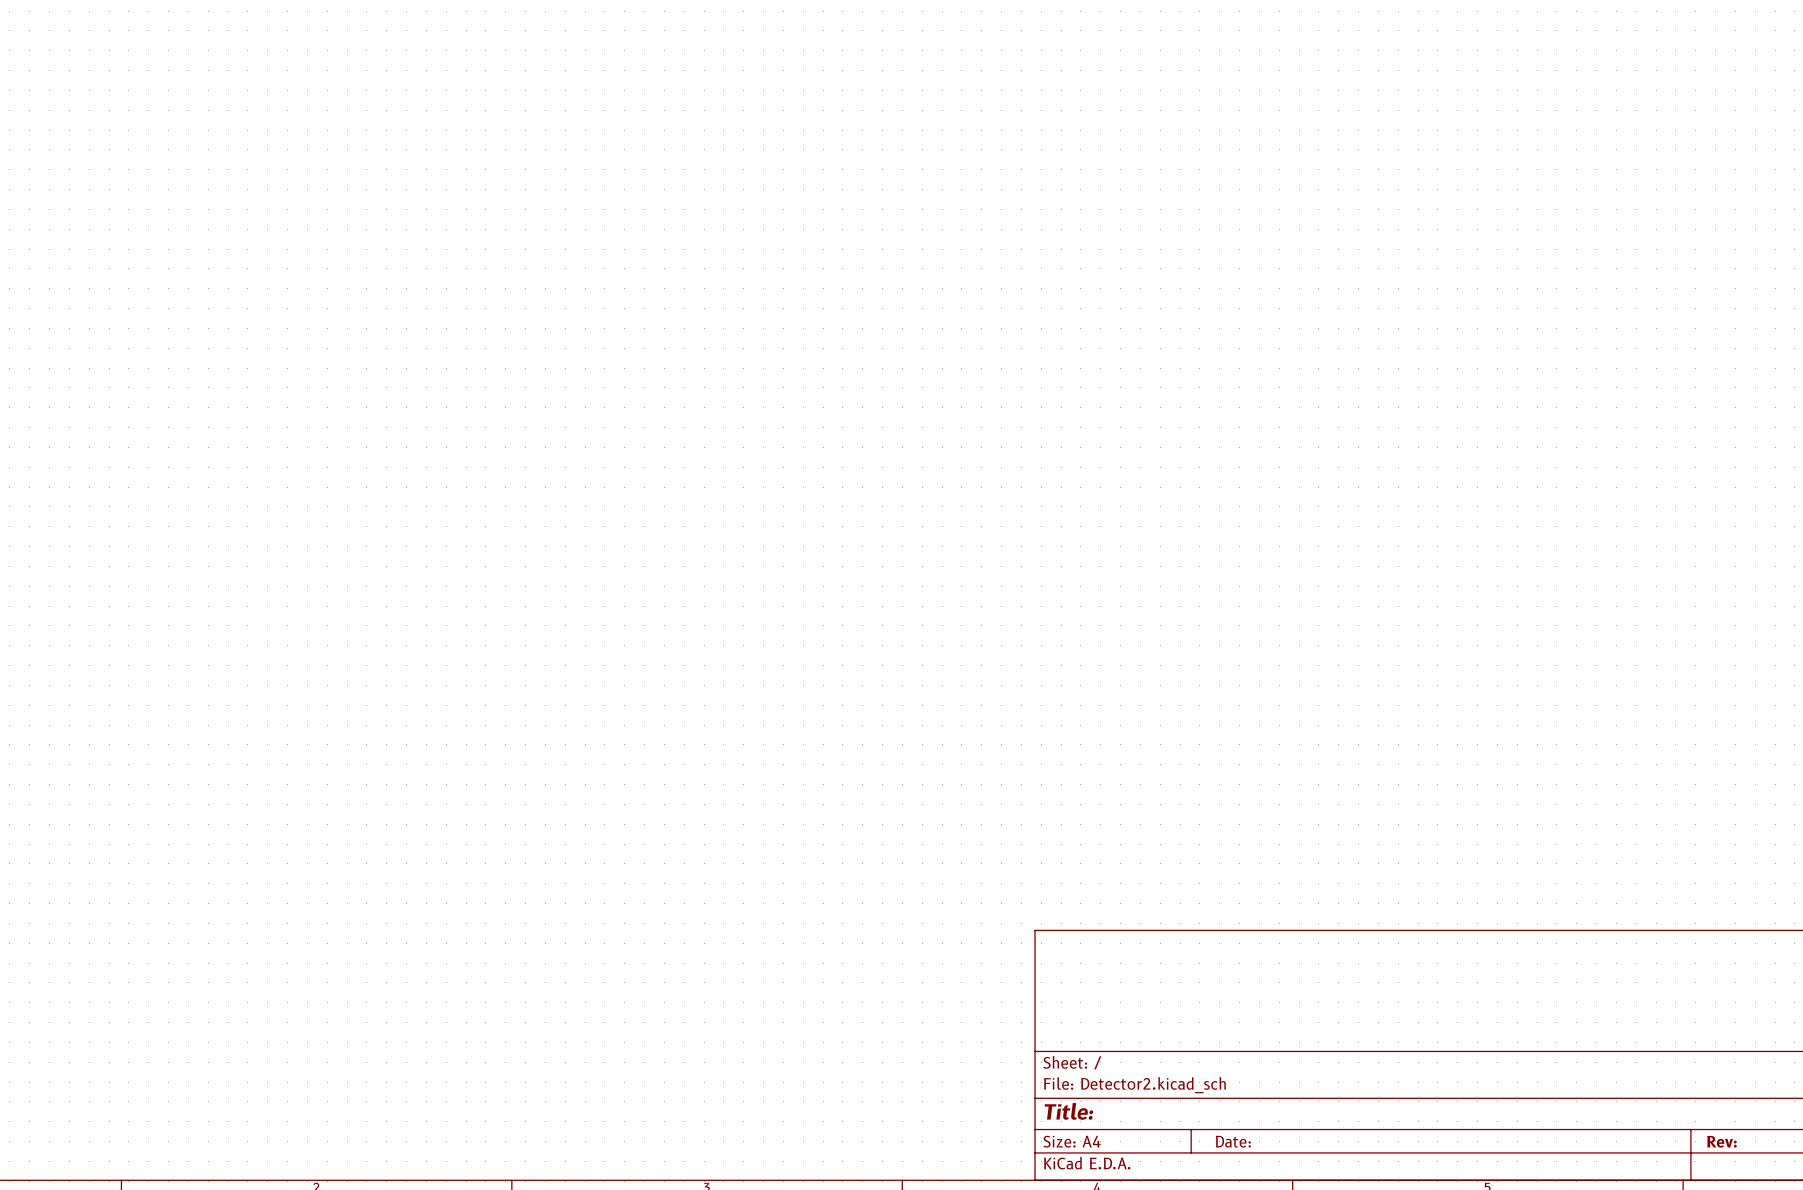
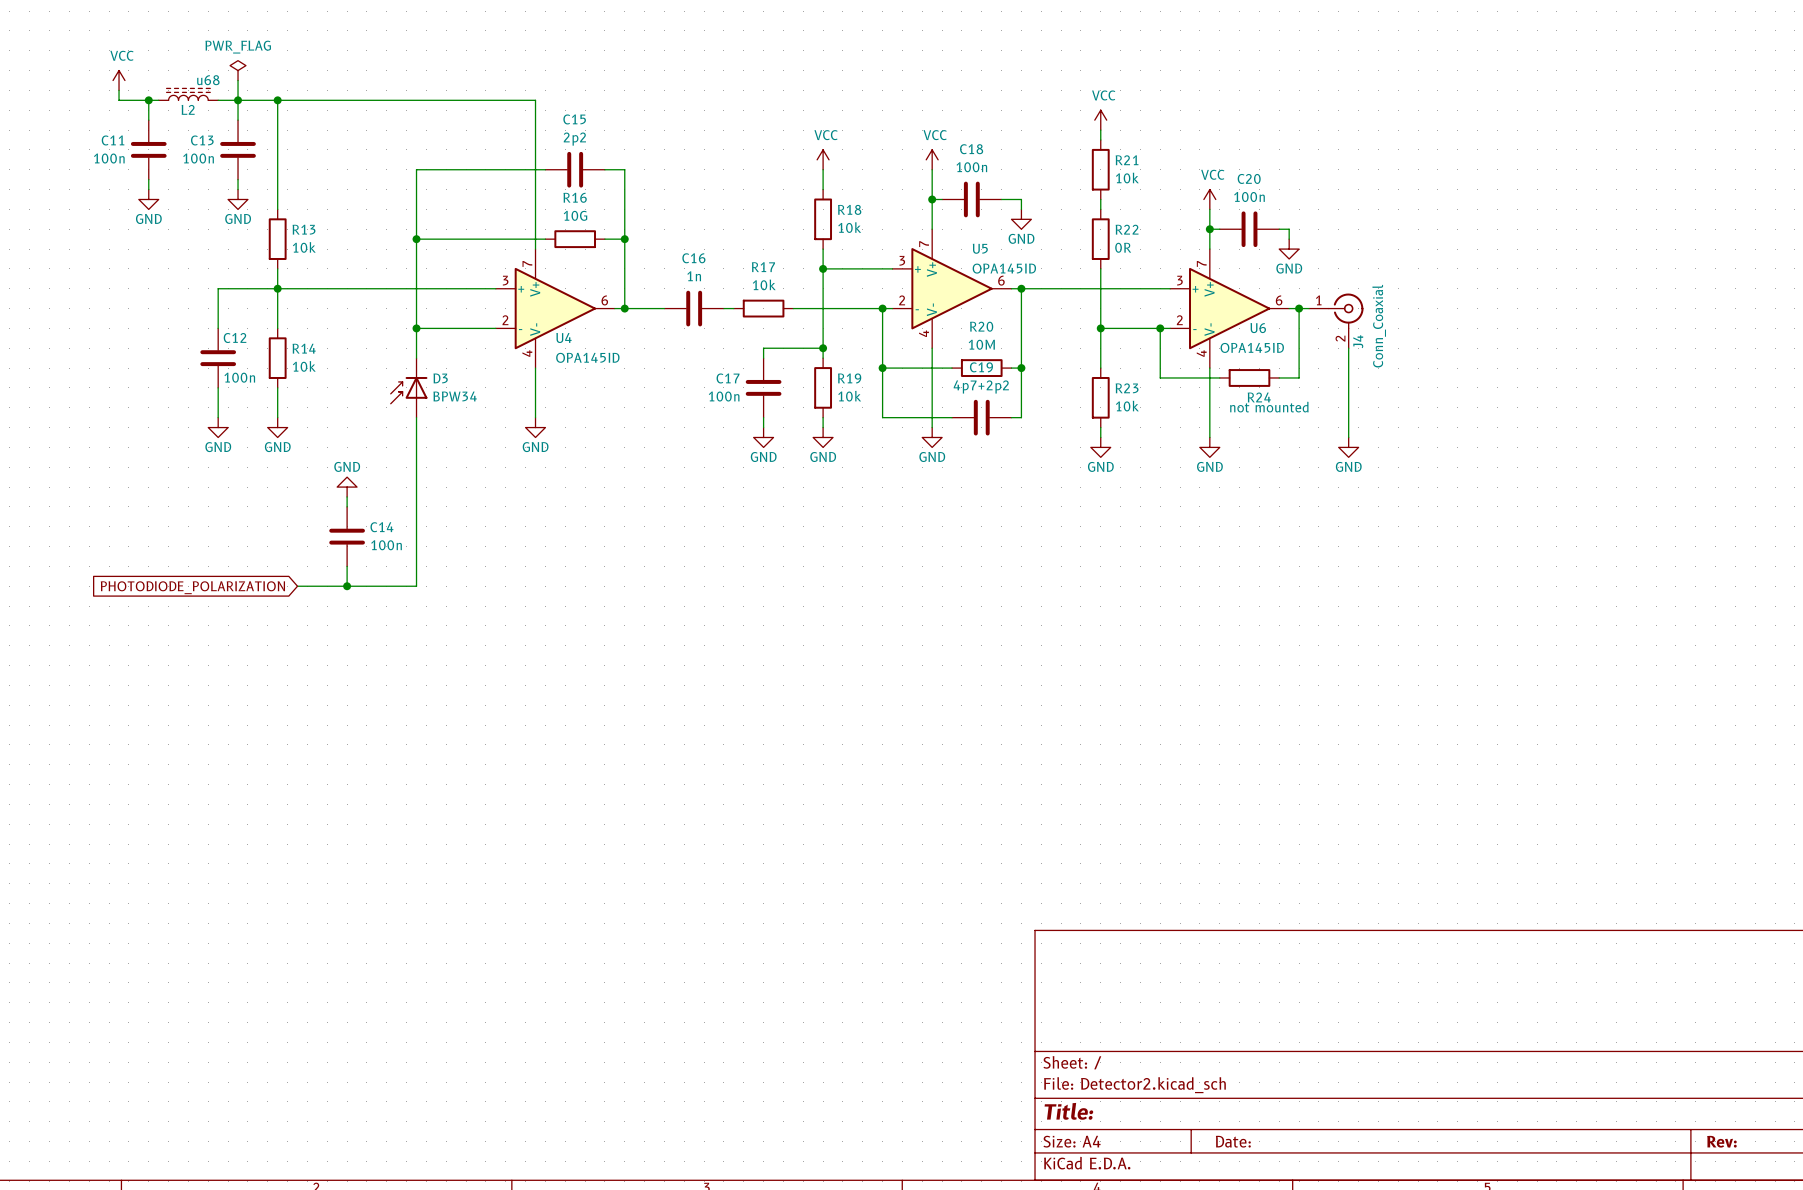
power symbol: none -> PWR_FLAG (238, 70)
power symbol: none -> VCC (119, 80)
wire: none -> (238, 80) (238, 120)
wire: none -> (119, 90) (119, 100) (158, 100)
L2: none -> u68 (188, 94)
wire: none -> (148, 100) (148, 120)
junction: none -> (148, 100)
wire: none -> (218, 100) (535, 100) (535, 249)
junction: none -> (238, 100)
wire: none -> (277, 100) (277, 209)
junction: none -> (277, 100)
power symbol: none -> VCC (1100, 120)
wire: none -> (1100, 130) (1100, 139)
C11: none -> 100n (148, 149)
C13: none -> 100n (238, 149)
power symbol: none -> VCC (823, 159)
power symbol: none -> VCC (932, 159)
wire: none -> (545, 169) (416, 169) (416, 358)
C15: none -> 2p2 (575, 169)
wire: none -> (604, 169) (624, 169) (624, 308)
wire: none -> (823, 169) (823, 189)
wire: none -> (932, 169) (932, 229)
R21: none -> 10k (1100, 169)
wire: none -> (148, 179) (148, 189)
wire: none -> (238, 179) (238, 189)
power symbol: none -> GND (148, 199)
power symbol: none -> GND (238, 199)
wire: none -> (932, 199) (942, 199)
junction: none -> (932, 199)
C18: none -> 100n (971, 199)
wire: none -> (1001, 199) (1021, 199) (1021, 209)
wire: none -> (1100, 199) (1100, 209)
power symbol: none -> VCC (1209, 199)
wire: none -> (1209, 209) (1209, 249)
R18: none -> 10k (823, 219)
power symbol: none -> GND (1021, 219)
wire: none -> (1209, 229) (1219, 229)
junction: none -> (1209, 229)
C20: none -> 100n (1249, 229)
wire: none -> (1279, 229) (1289, 229) (1289, 239)
R13: none -> 10k (277, 239)
wire: none -> (416, 239) (545, 239)
junction: none -> (416, 239)
R16: none -> 10G (575, 239)
wire: none -> (604, 239) (624, 239)
junction: none -> (624, 239)
R22: none -> 0R (1100, 239)
wire: none -> (823, 249) (823, 358)
power symbol: none -> GND (1289, 249)
wire: none -> (277, 268) (277, 328)
wire: none -> (823, 268) (892, 268)
junction: none -> (823, 268)
wire: none -> (1100, 268) (1100, 368)
junction: none -> (277, 288)
wire: none -> (495, 288) (218, 288) (218, 328)
U5: none -> OPA145ID (952, 288)
wire: none -> (1011, 288) (1170, 288)
wire: none -> (1021, 288) (1021, 417) (1011, 417)
junction: none -> (1021, 288)
U4: none -> OPA145ID (555, 308)
wire: none -> (614, 308) (664, 308)
junction: none -> (624, 308)
C16: none -> 1n (694, 308)
wire: none -> (723, 308) (733, 308)
R17: none -> 10k (763, 308)
wire: none -> (793, 308) (892, 308)
wire: none -> (882, 308) (882, 417) (952, 417)
junction: none -> (882, 308)
U6: none -> OPA145ID (1229, 308)
wire: none -> (1289, 308) (1309, 308)
wire: none -> (1299, 308) (1299, 377) (1279, 377)
junction: none -> (1299, 308)
J4: none -> Conn_Coaxial (1336, 320)
wire: none -> (416, 328) (495, 328)
junction: none -> (416, 328)
wire: none -> (1100, 328) (1170, 328)
junction: none -> (1100, 328)
wire: none -> (1160, 328) (1160, 377) (1219, 377)
junction: none -> (1160, 328)
wire: none -> (823, 348) (763, 348) (763, 358)
junction: none -> (823, 348)
wire: none -> (932, 348) (932, 427)
wire: none -> (1348, 348) (1348, 437)
C12: none -> 100n (218, 358)
R14: none -> 10k (277, 358)
wire: none -> (535, 368) (535, 417)
wire: none -> (882, 368) (952, 368)
junction: none -> (882, 368)
R20: none -> 10M (981, 368)
wire: none -> (1011, 368) (1021, 368)
junction: none -> (1021, 368)
wire: none -> (1209, 368) (1209, 437)
R24: none -> not mounted (1249, 377)
wire: none -> (218, 387) (218, 417)
wire: none -> (277, 387) (277, 417)
D3: none -> BPW34 (409, 387)
C17: none -> 100n (763, 387)
R19: none -> 10k (823, 387)
R23: none -> 10k (1100, 397)
wire: none -> (416, 417) (416, 586) (297, 586)
wire: none -> (763, 417) (763, 427)
wire: none -> (823, 417) (823, 427)
C19: none -> 4p7+2p2 (981, 417)
power symbol: none -> GND (218, 427)
power symbol: none -> GND (277, 427)
power symbol: none -> GND (535, 427)
wire: none -> (1100, 427) (1100, 437)
power symbol: none -> GND (763, 437)
power symbol: none -> GND (823, 437)
power symbol: none -> GND (932, 437)
power symbol: none -> GND (1100, 447)
power symbol: none -> GND (1209, 447)
power symbol: none -> GND (1348, 447)
power symbol: none -> GND (347, 487)
wire: none -> (347, 496) (347, 506)
C14: none -> 100n (347, 536)
wire: none -> (347, 566) (347, 586)
junction: none -> (347, 586)
global label: none -> PHOTODIODE_POLARIZATION (192, 587)

